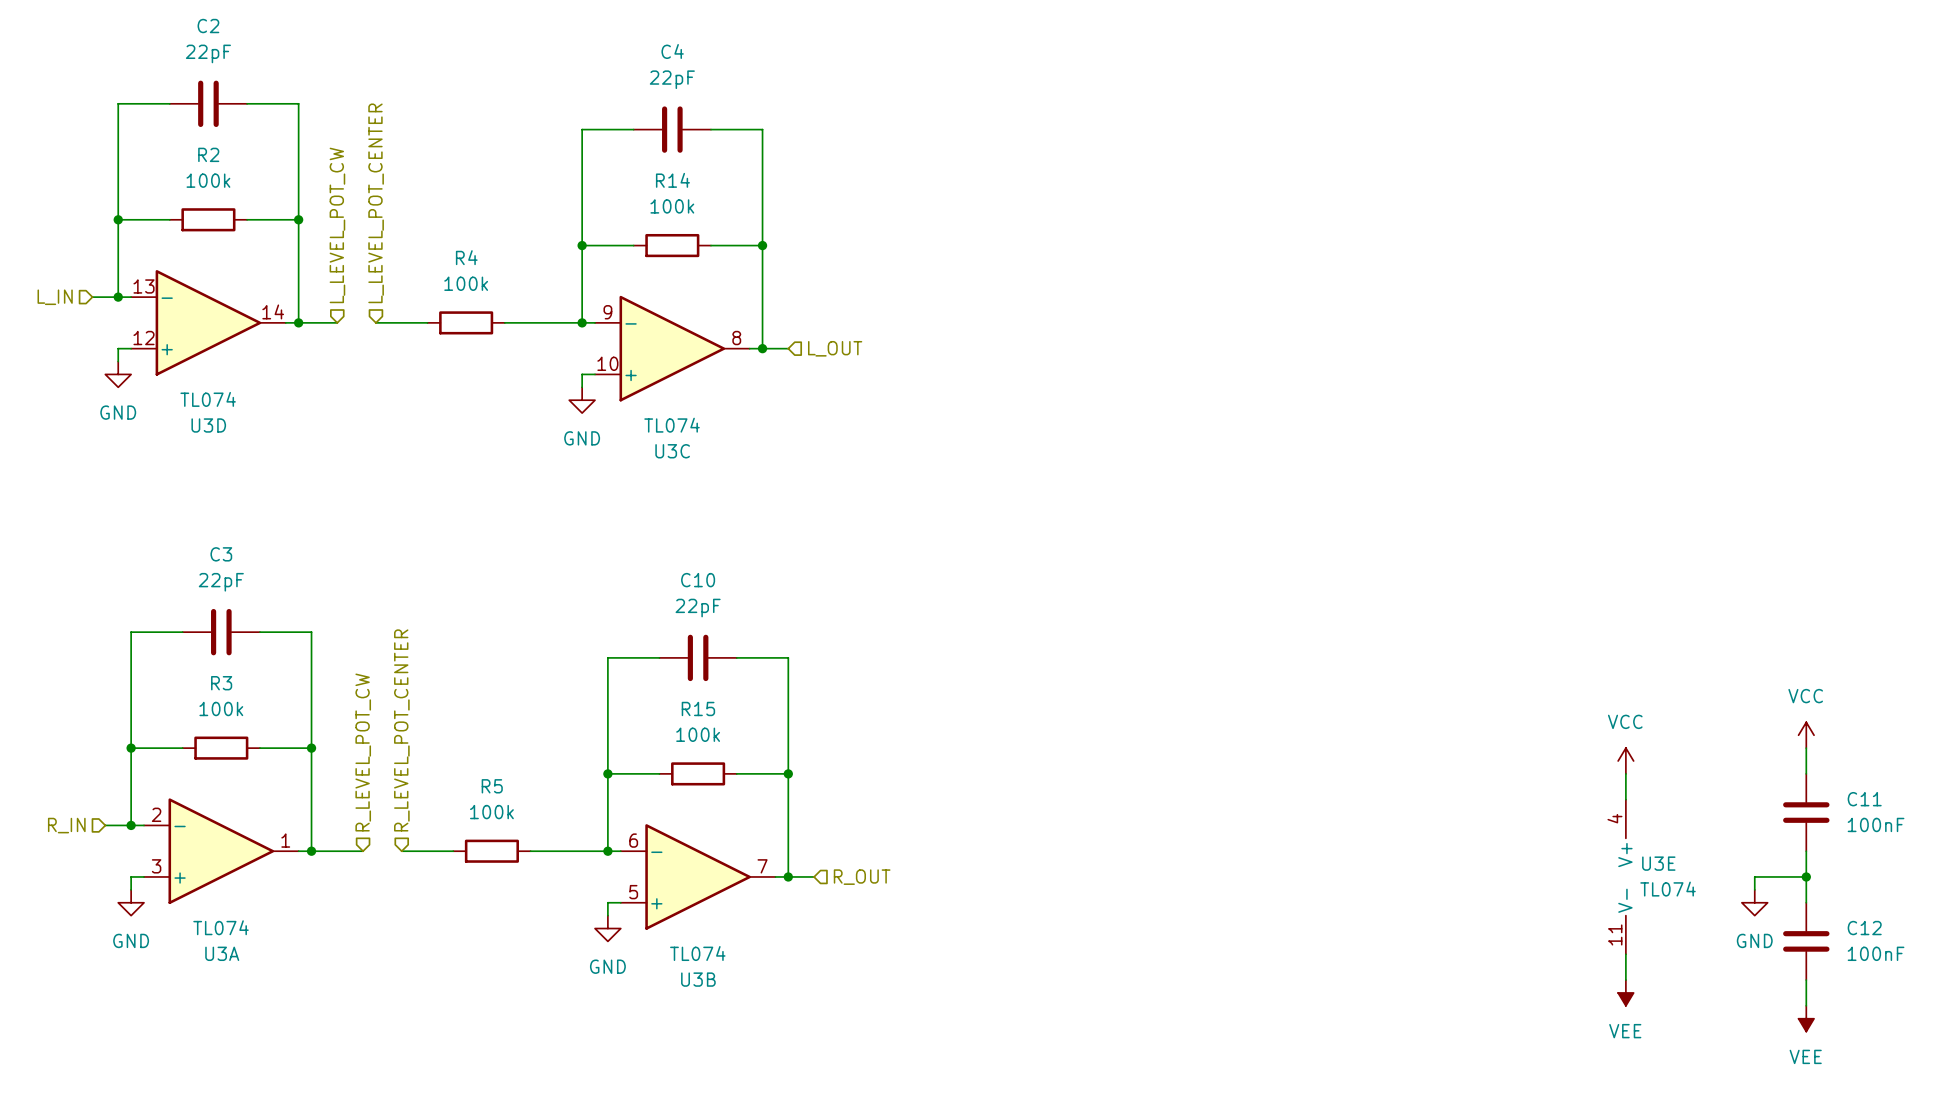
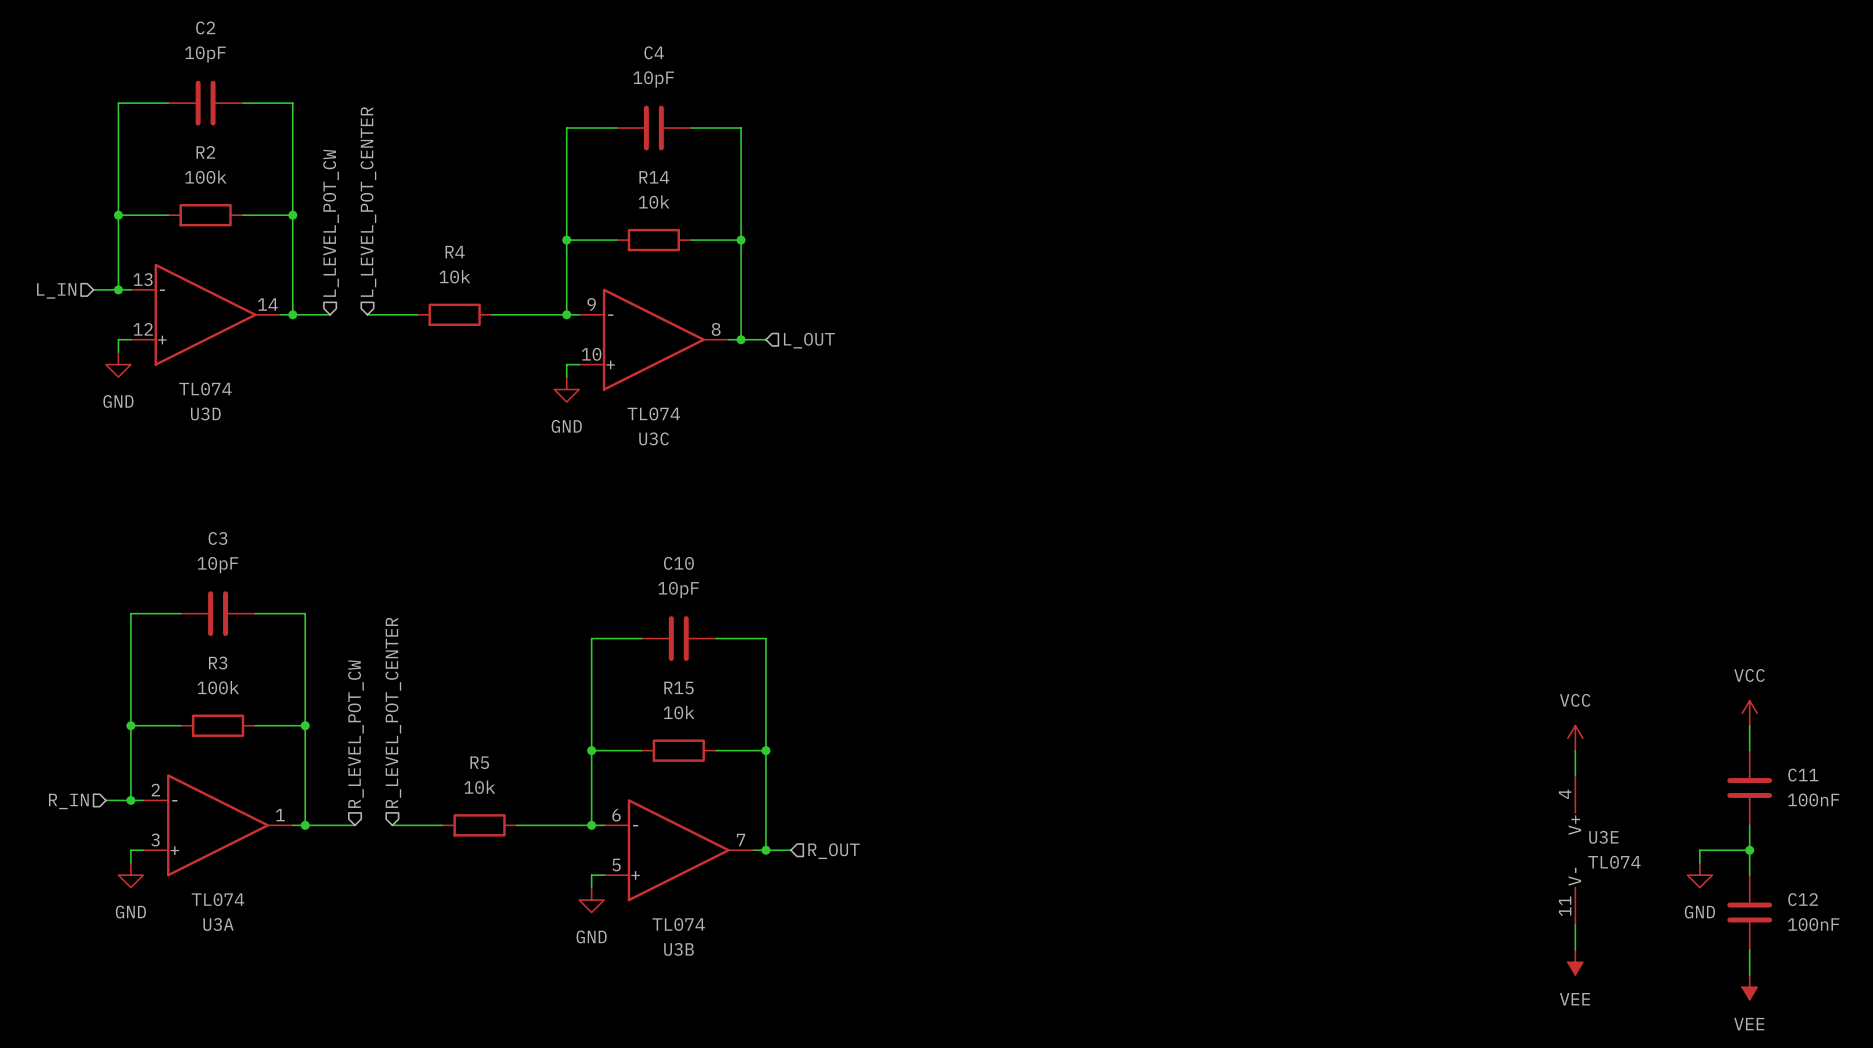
C2 value: 22pF (208, 53) -> 10pF (205, 54)
C4 value: 22pF (672, 79) -> 10pF (653, 79)
R14 value: 100k (672, 206) -> 10k (654, 202)
R4 value: 100k (466, 283) -> 10k (454, 276)
C3 value: 22pF (221, 582) -> 10pF (217, 565)
C10 value: 22pF (698, 608) -> 10pF (678, 589)
R15 value: 100k (698, 734) -> 10k (679, 712)
R5 value: 100k (491, 812) -> 10k (479, 787)

